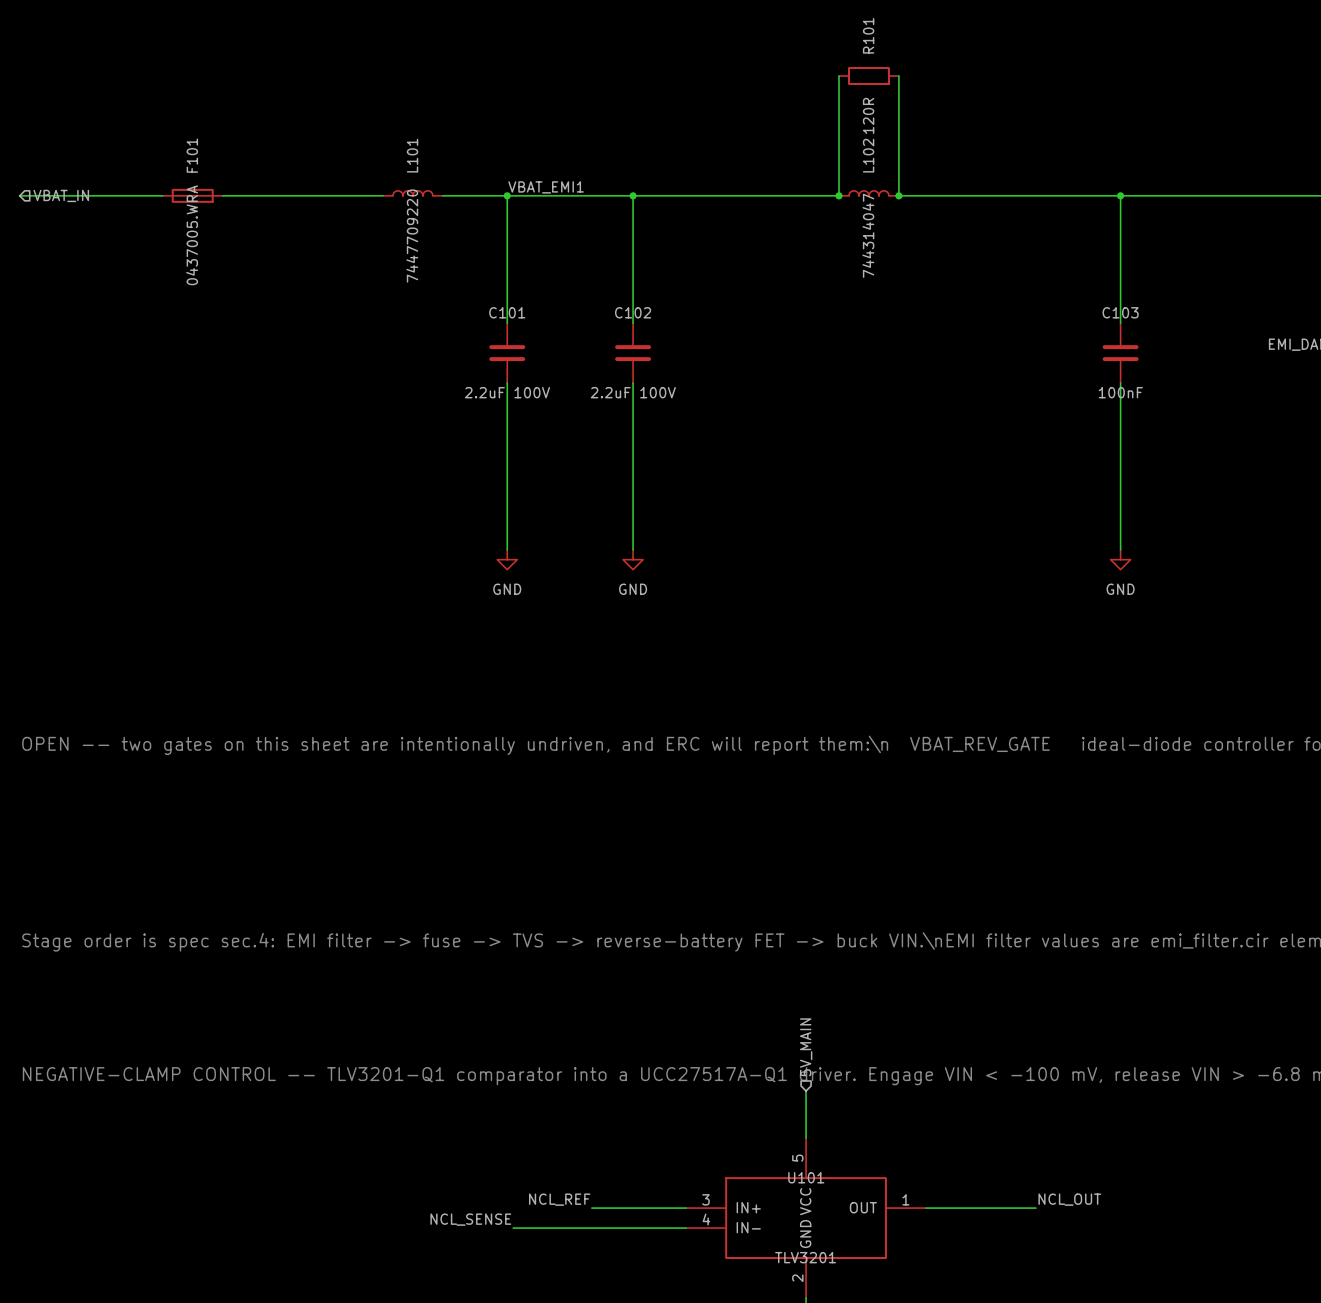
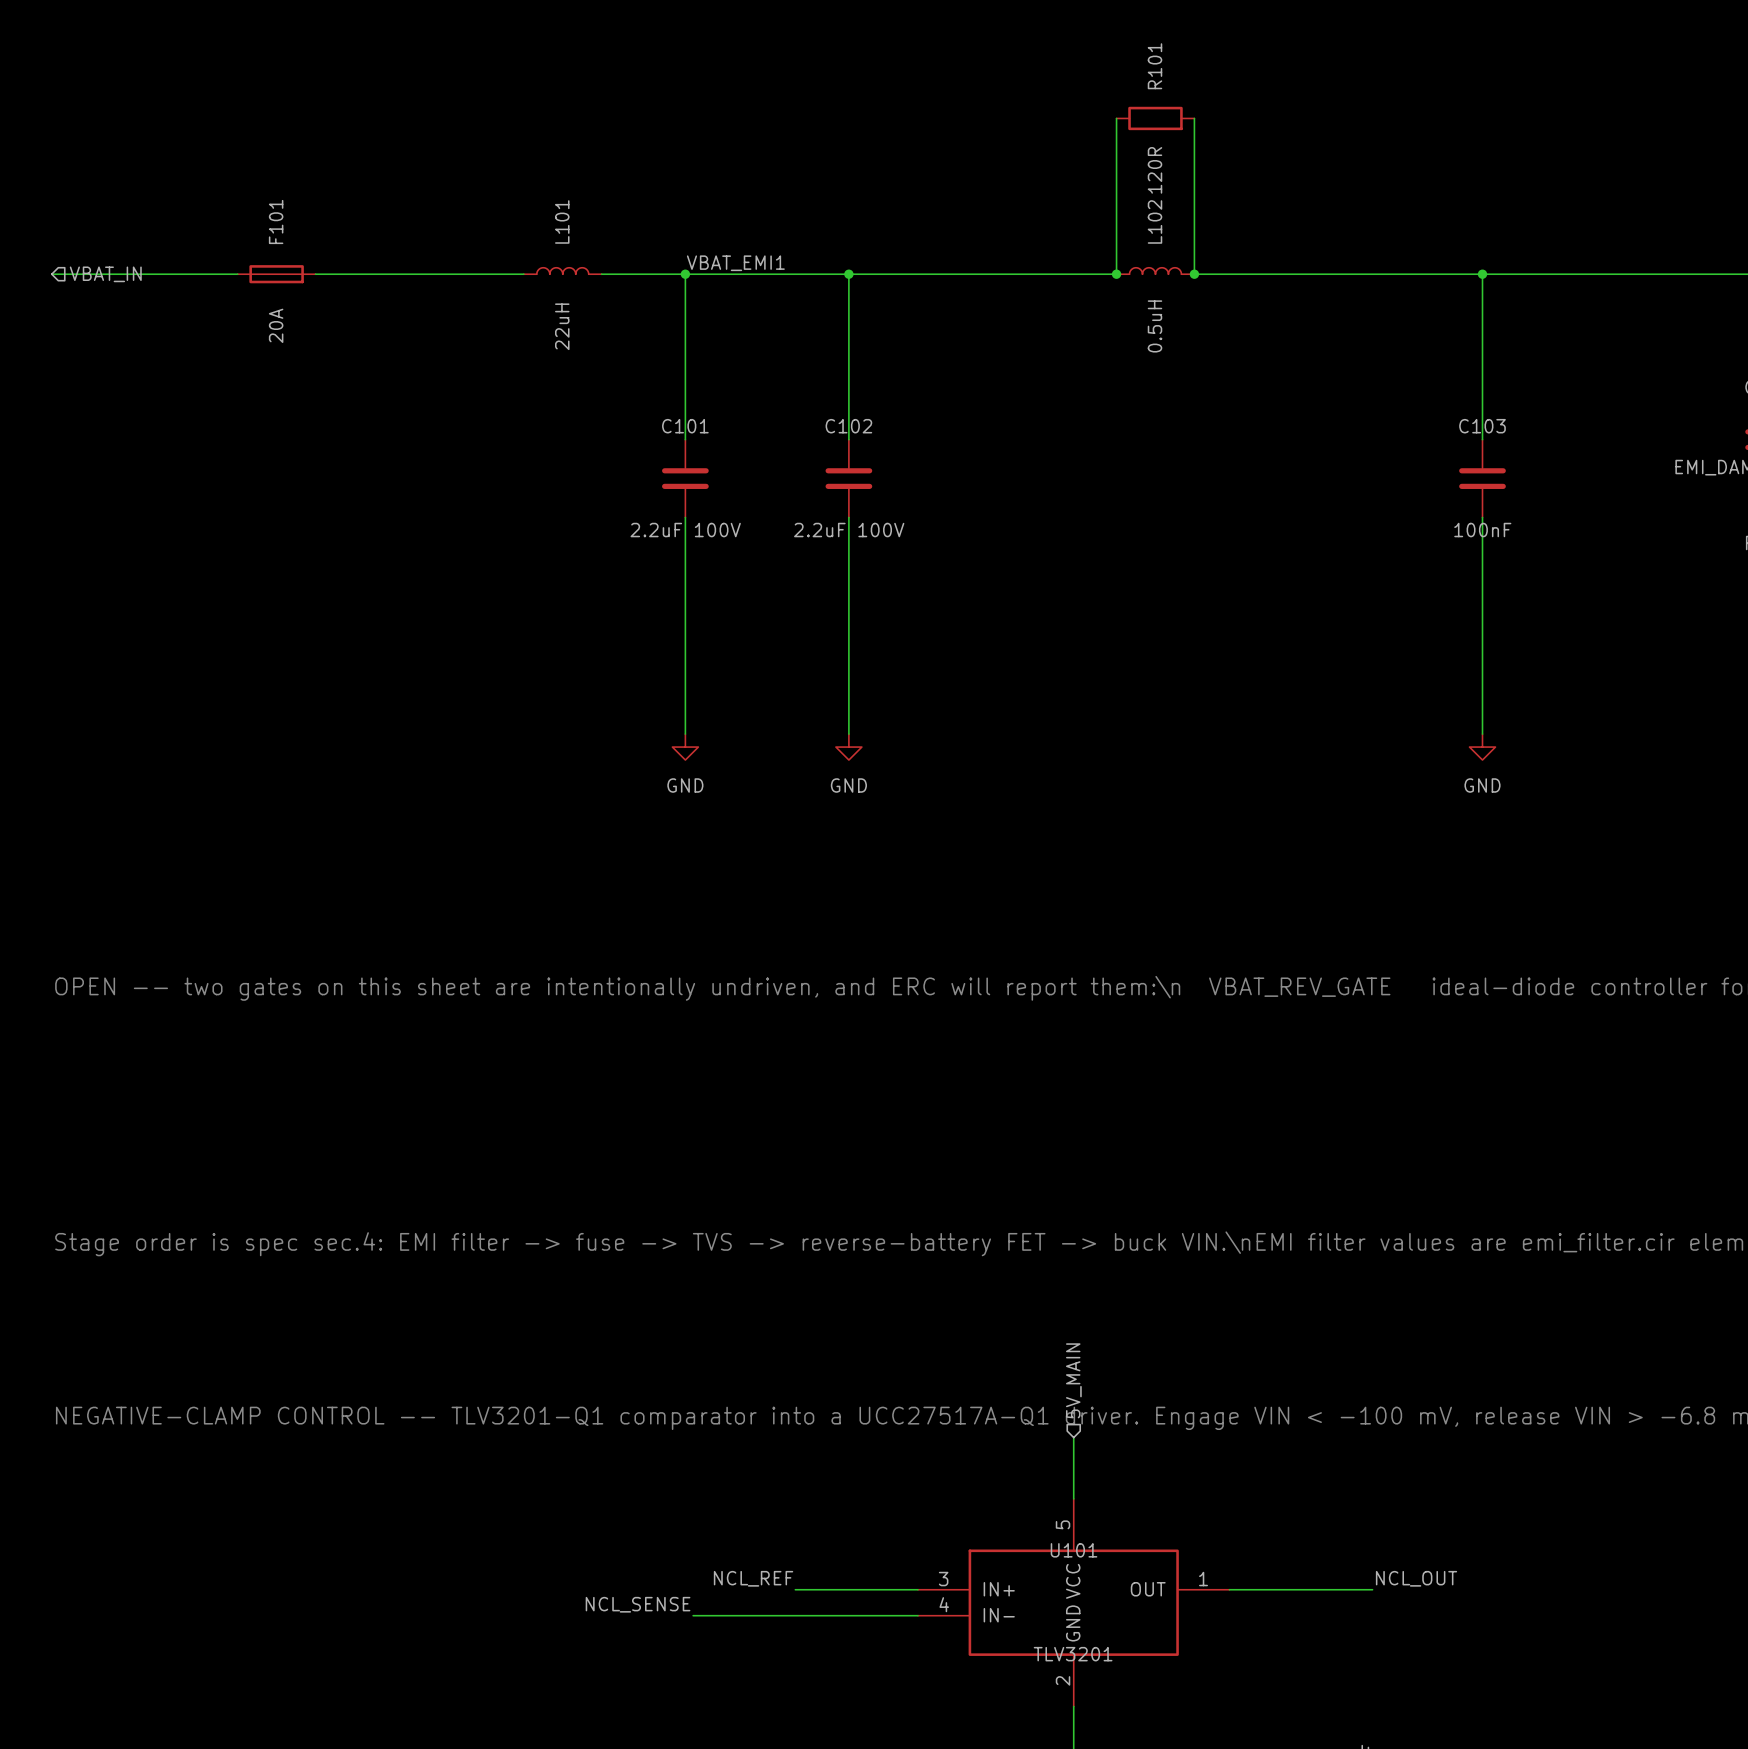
F101 value: 0437005.WRA (192, 235) -> 20A (276, 325)
L102 value: 744314047 (868, 235) -> 0.5uH (1154, 326)
L101 value: 7447709220 (412, 236) -> 22uH (562, 326)

